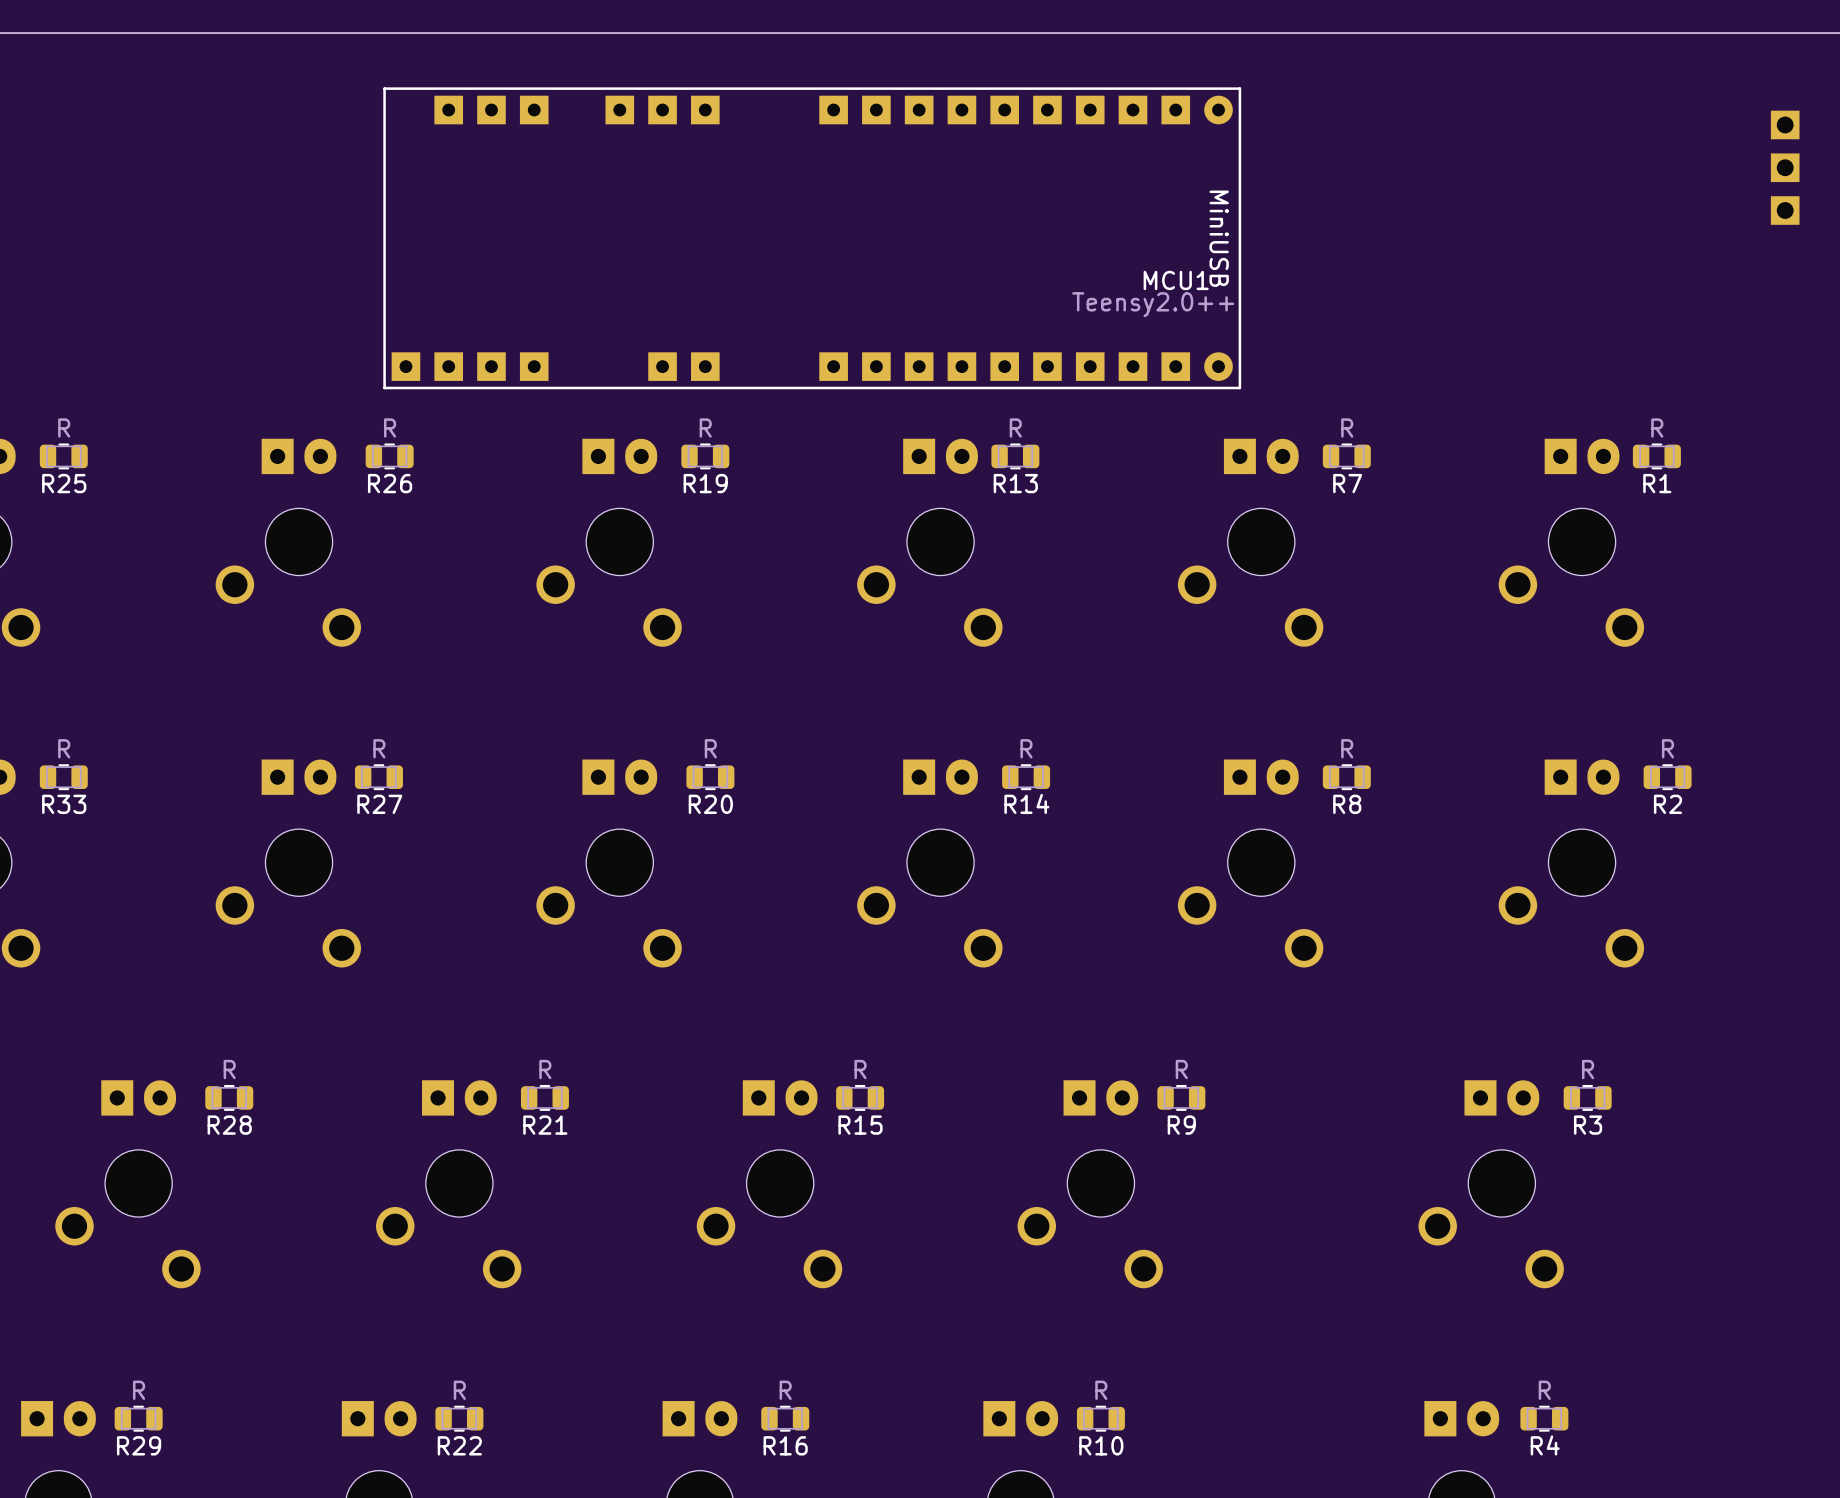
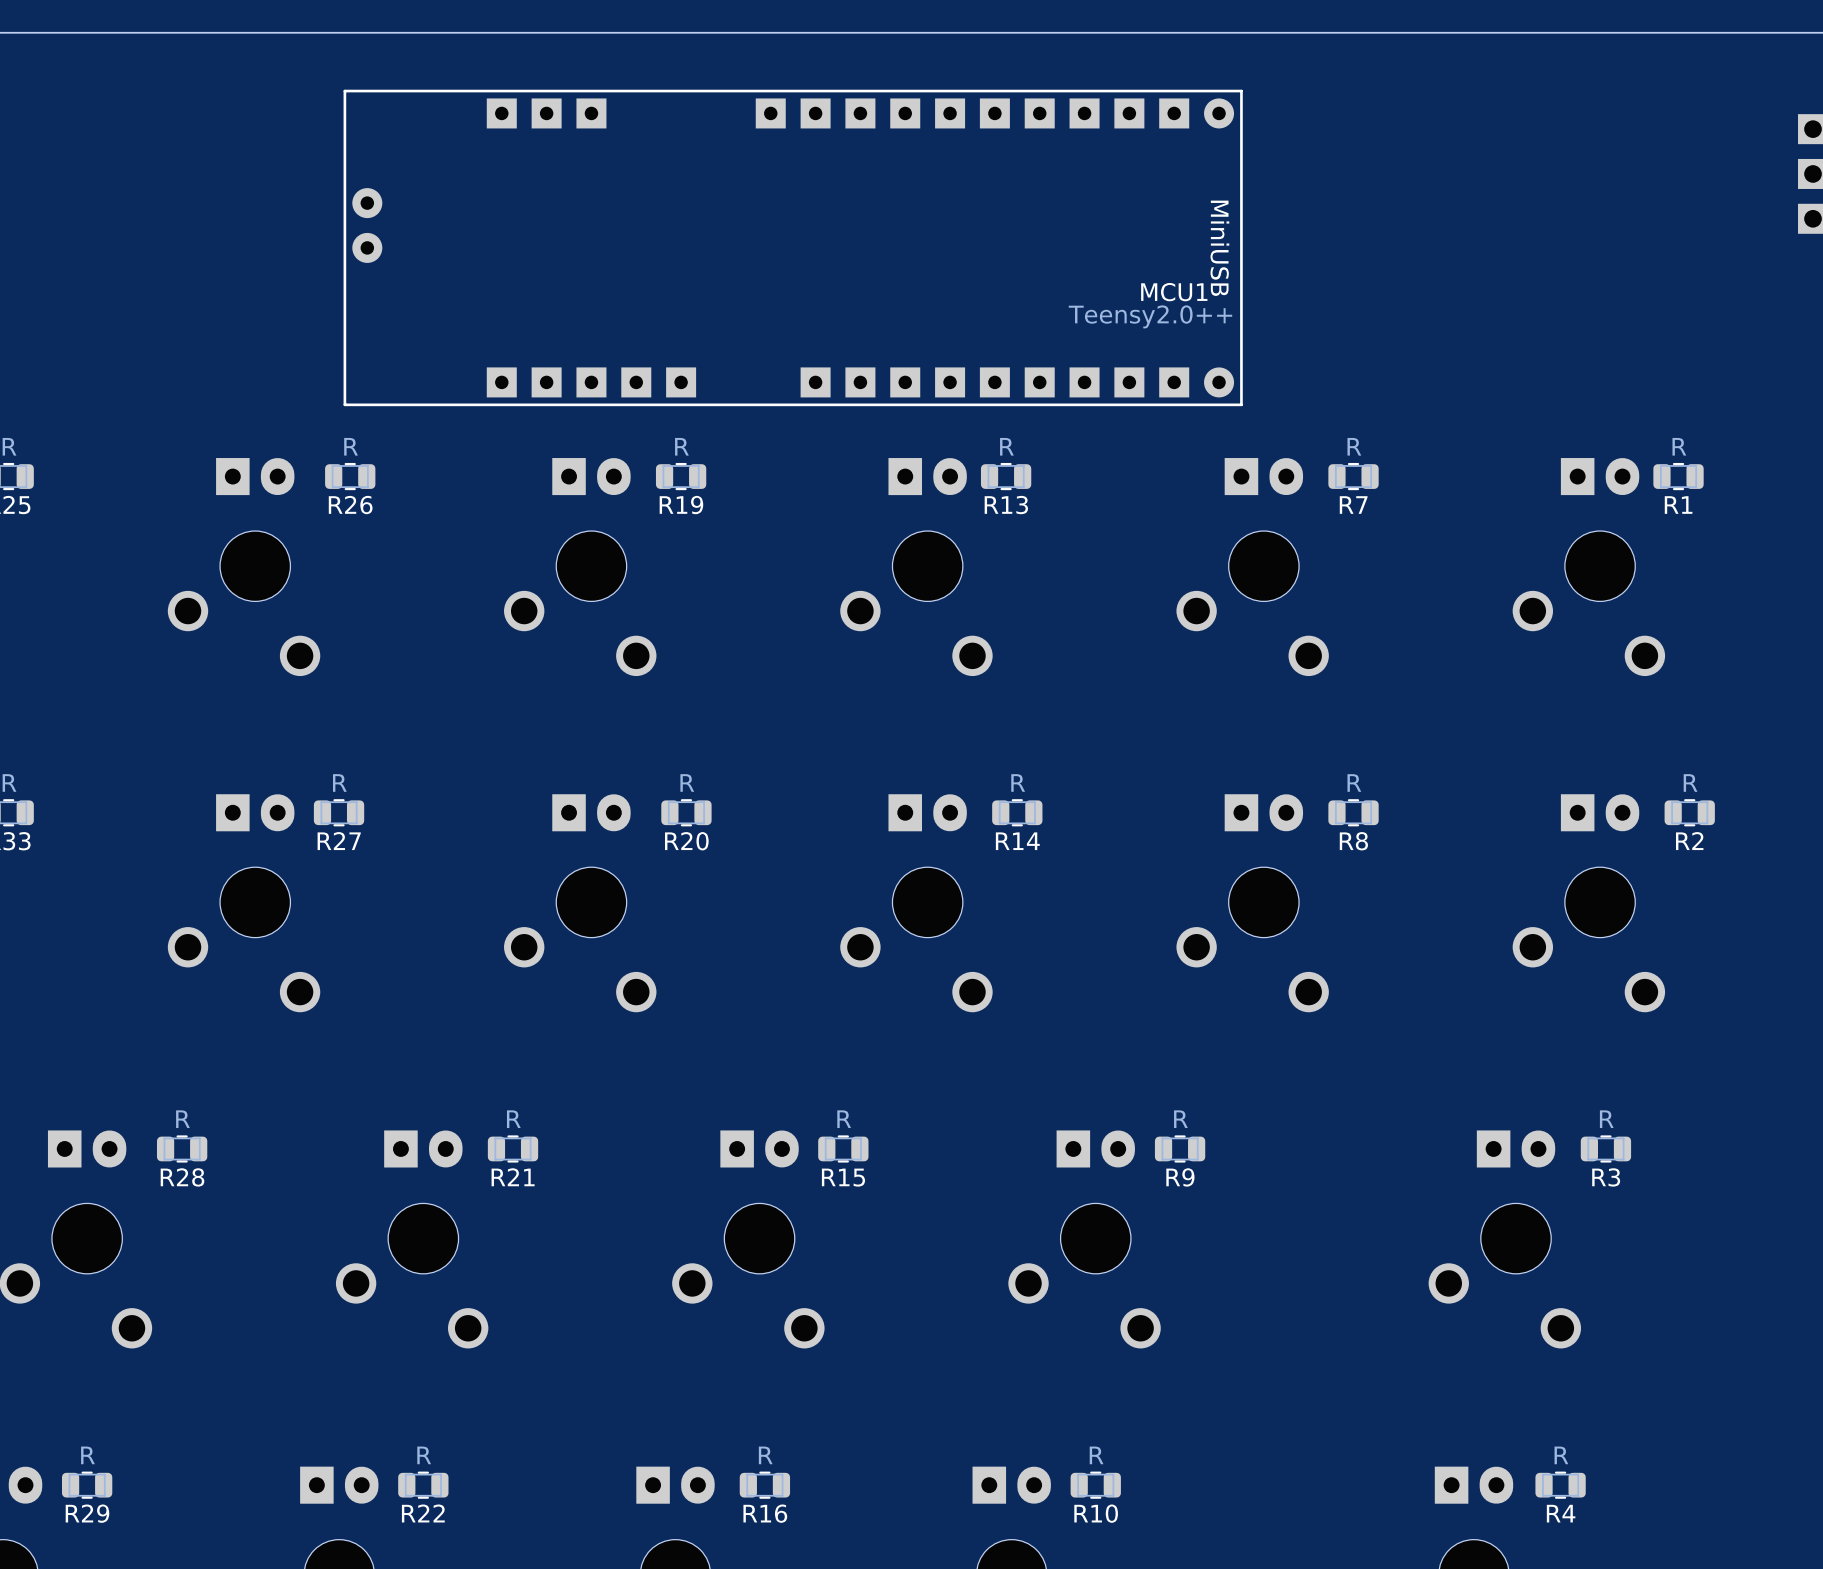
MCU1 footprint: [383, 87, 1242, 390] -> [343, 89, 1243, 407]

